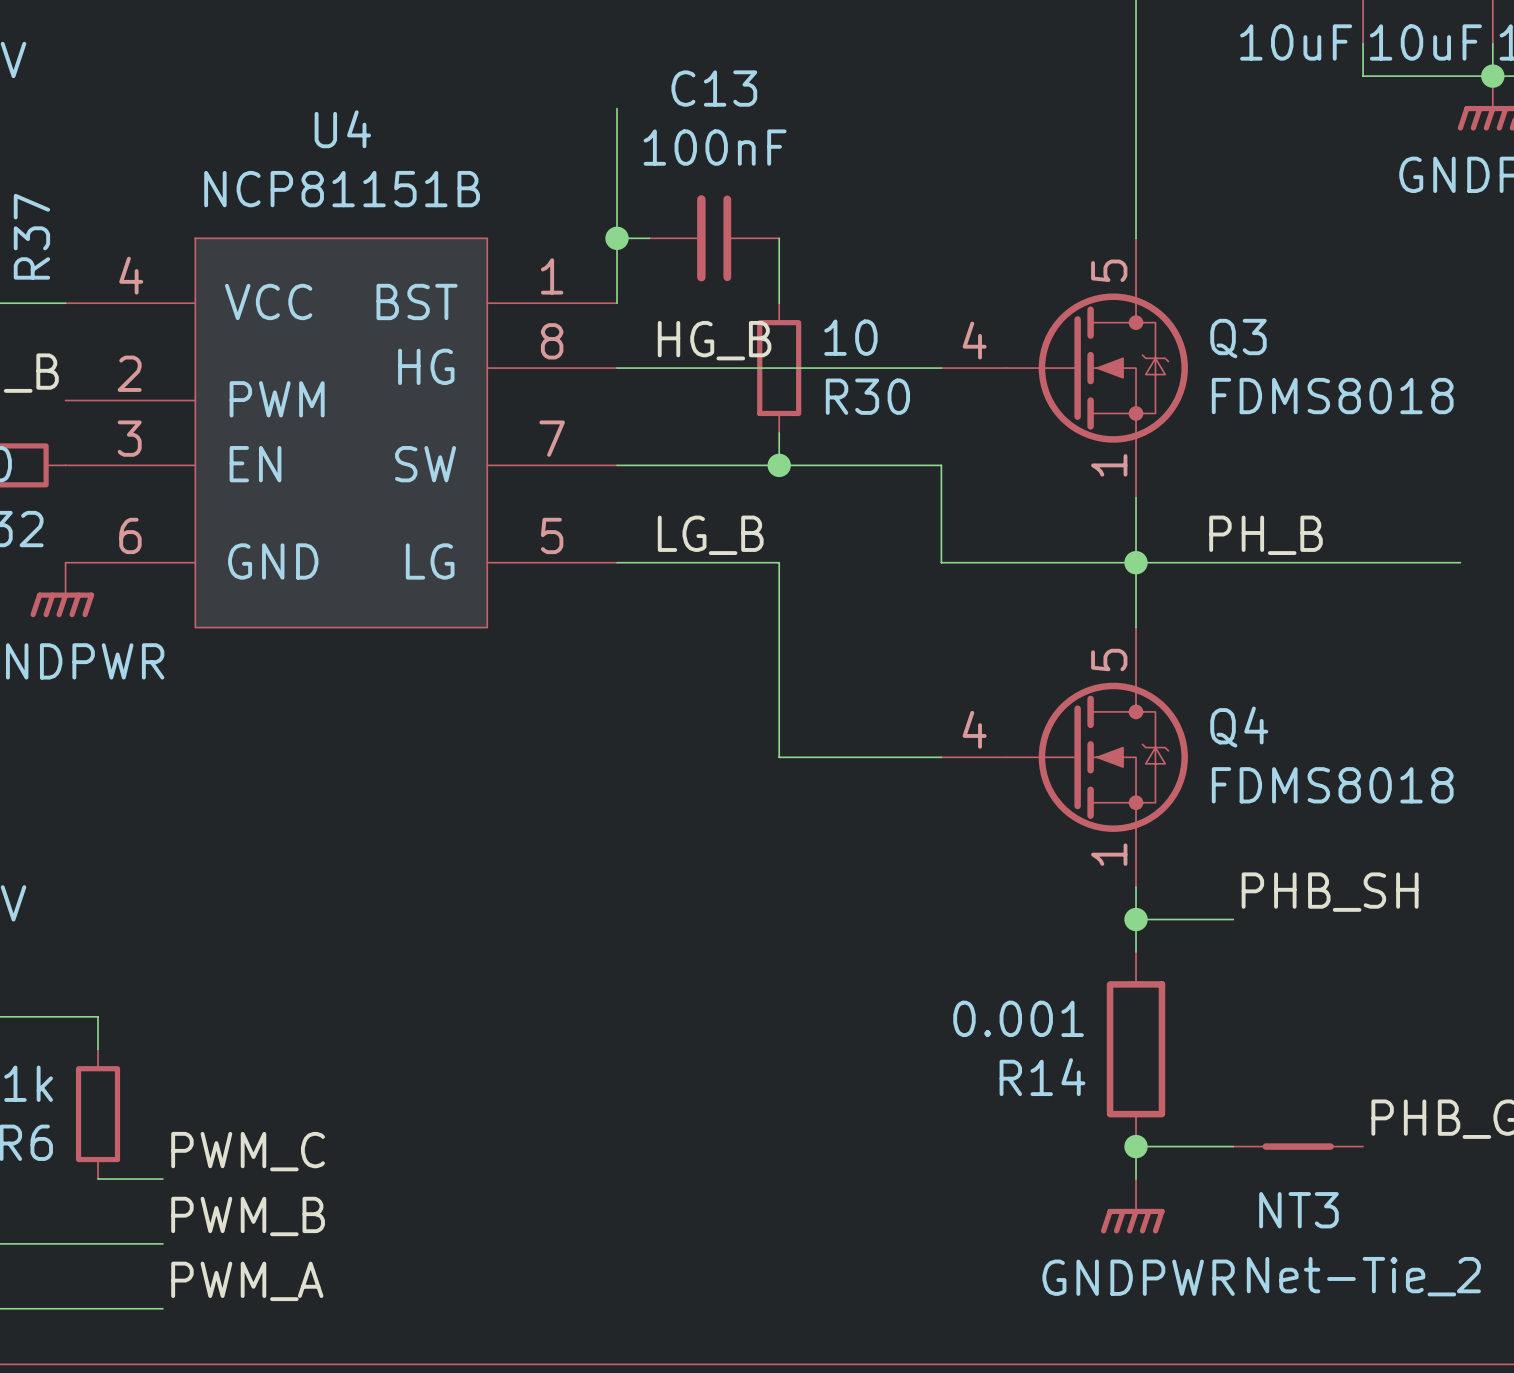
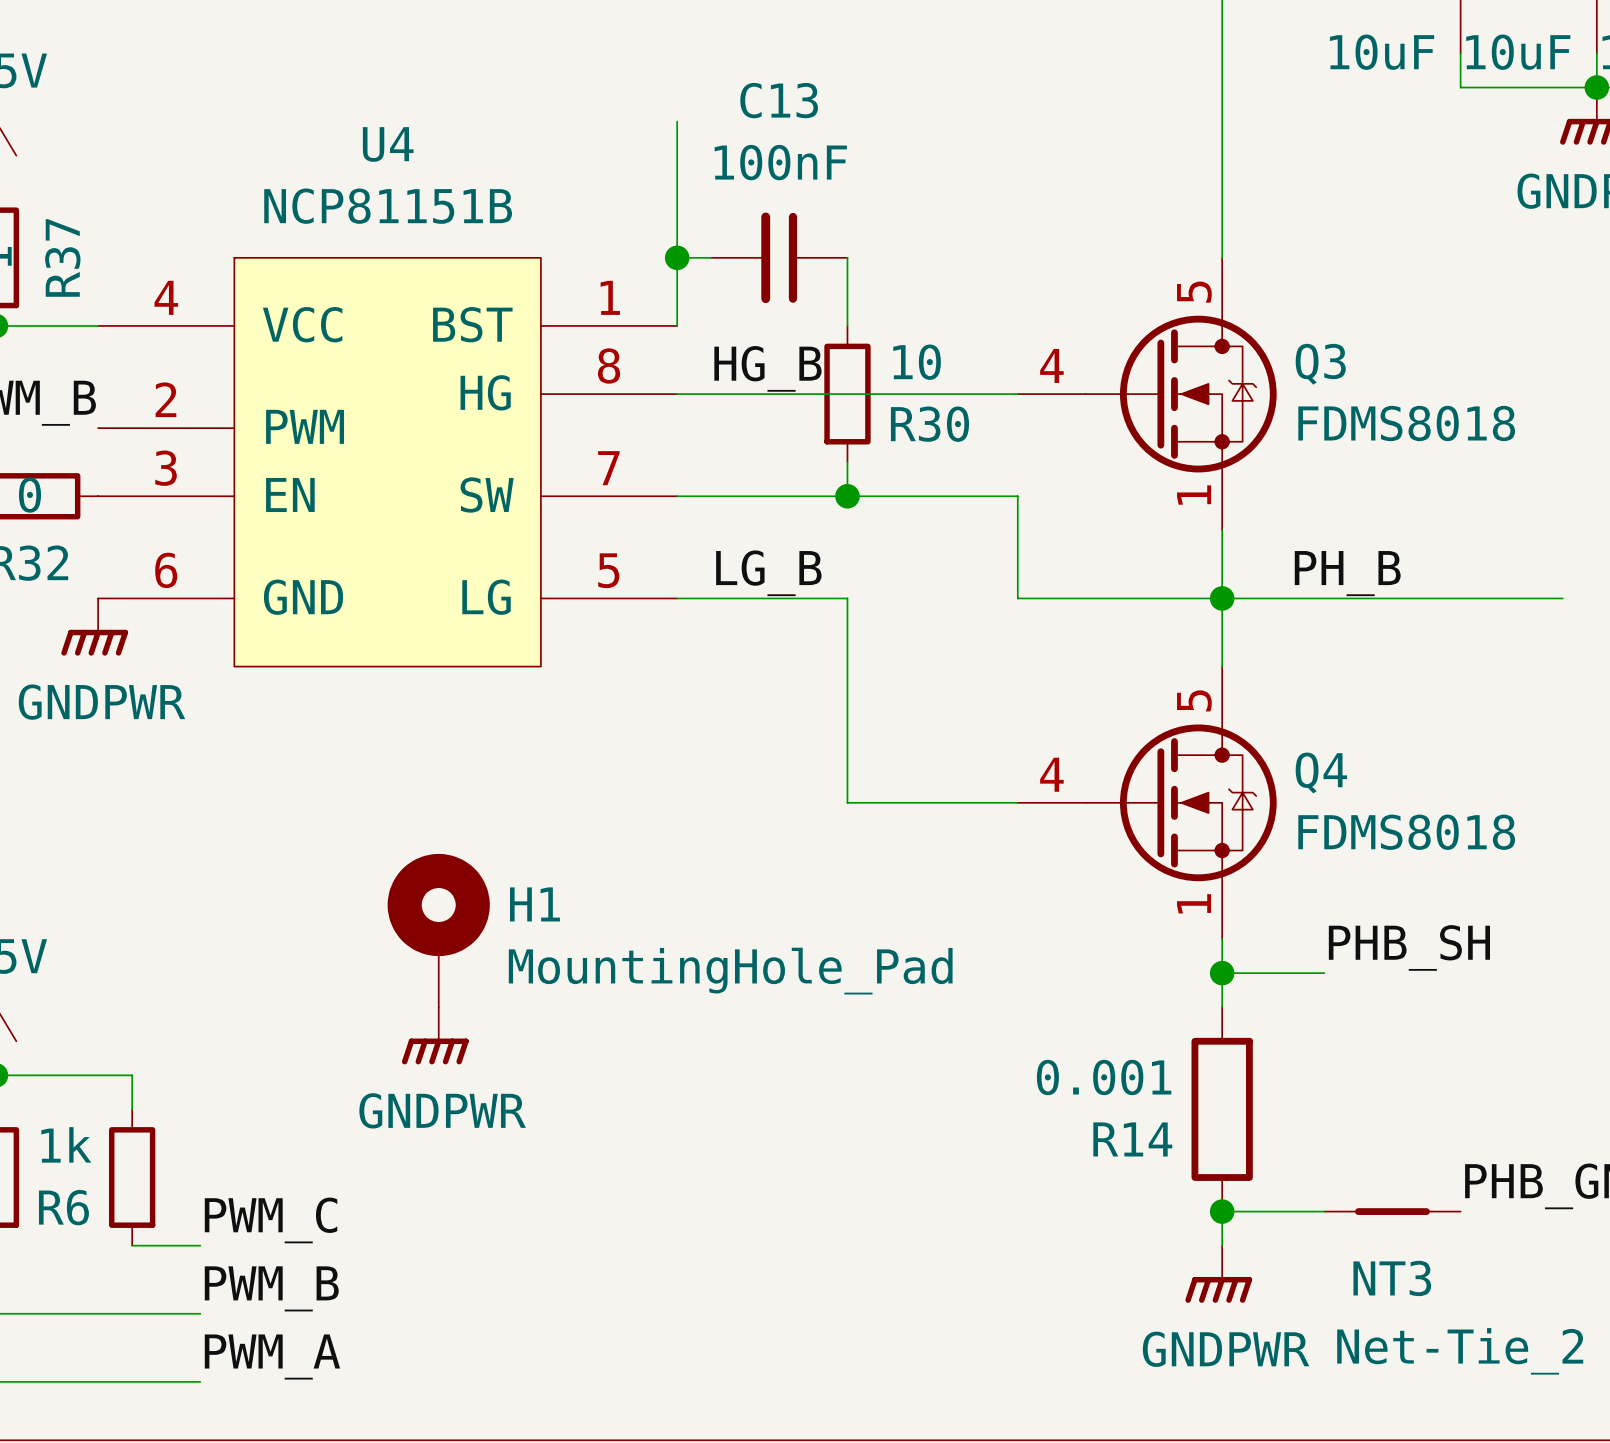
H1: none -> MountingHole_Pad (438, 930)
power symbol: none -> GNDPWR (435, 1035)

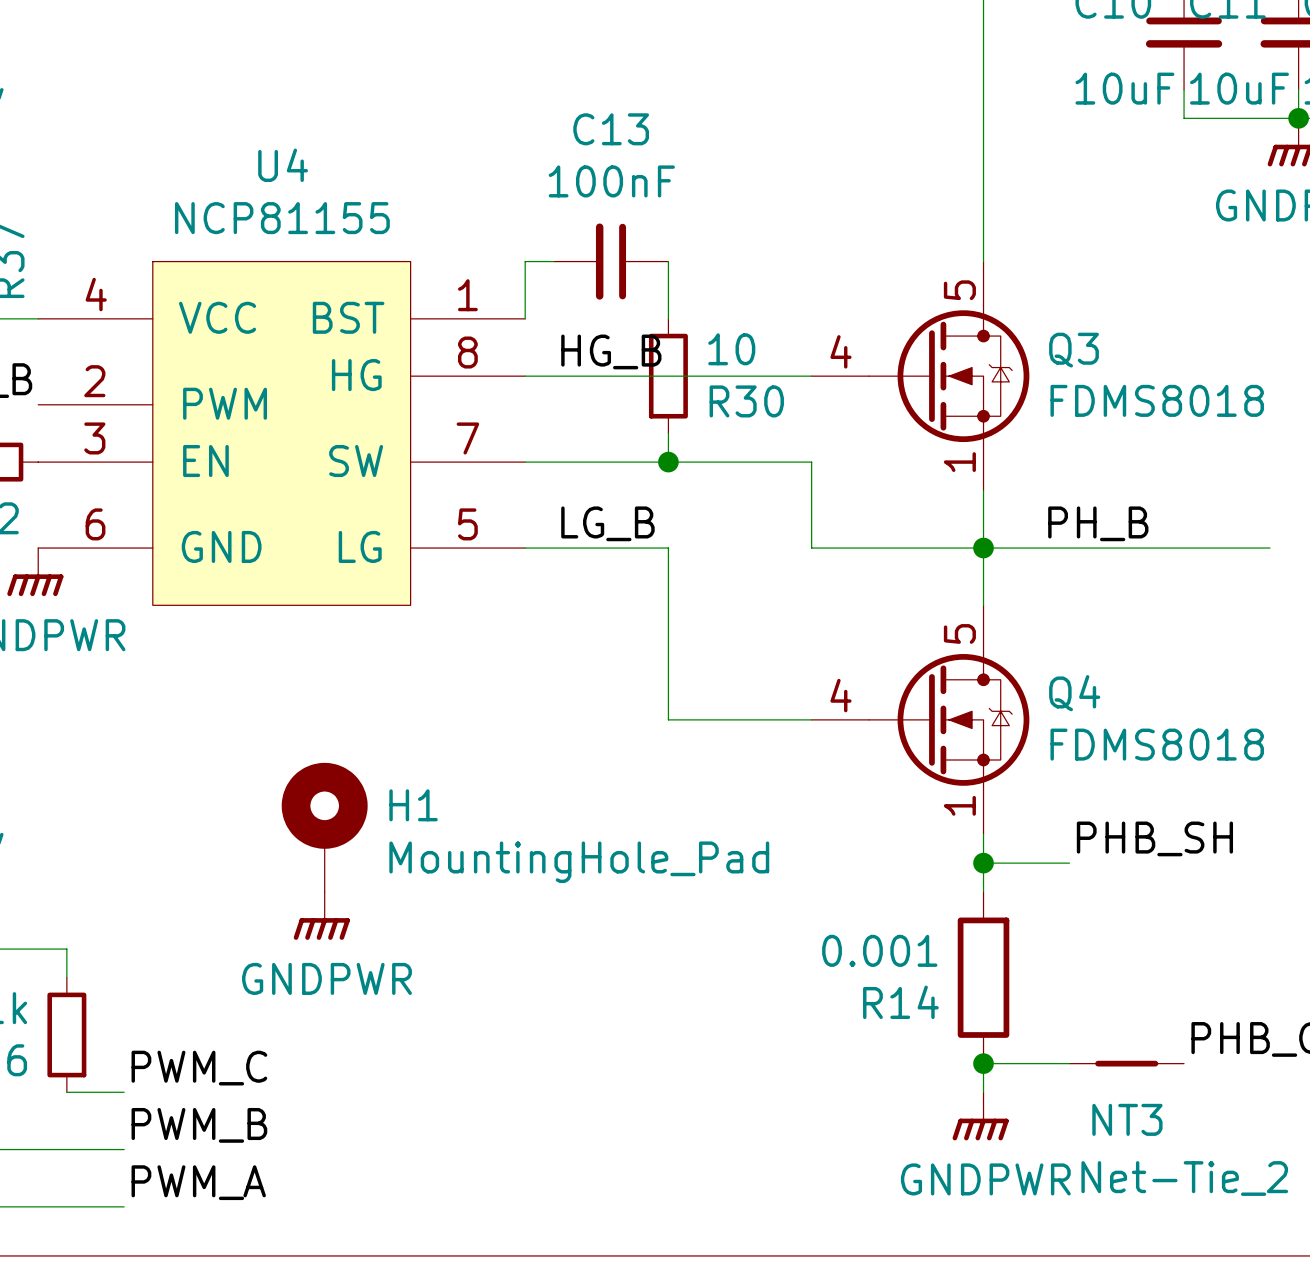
wire: (677, 121) (677, 257) -> none
U4 value: NCP81151B (388, 206) -> NCP81155 (282, 218)
junction: (677, 257) -> none

